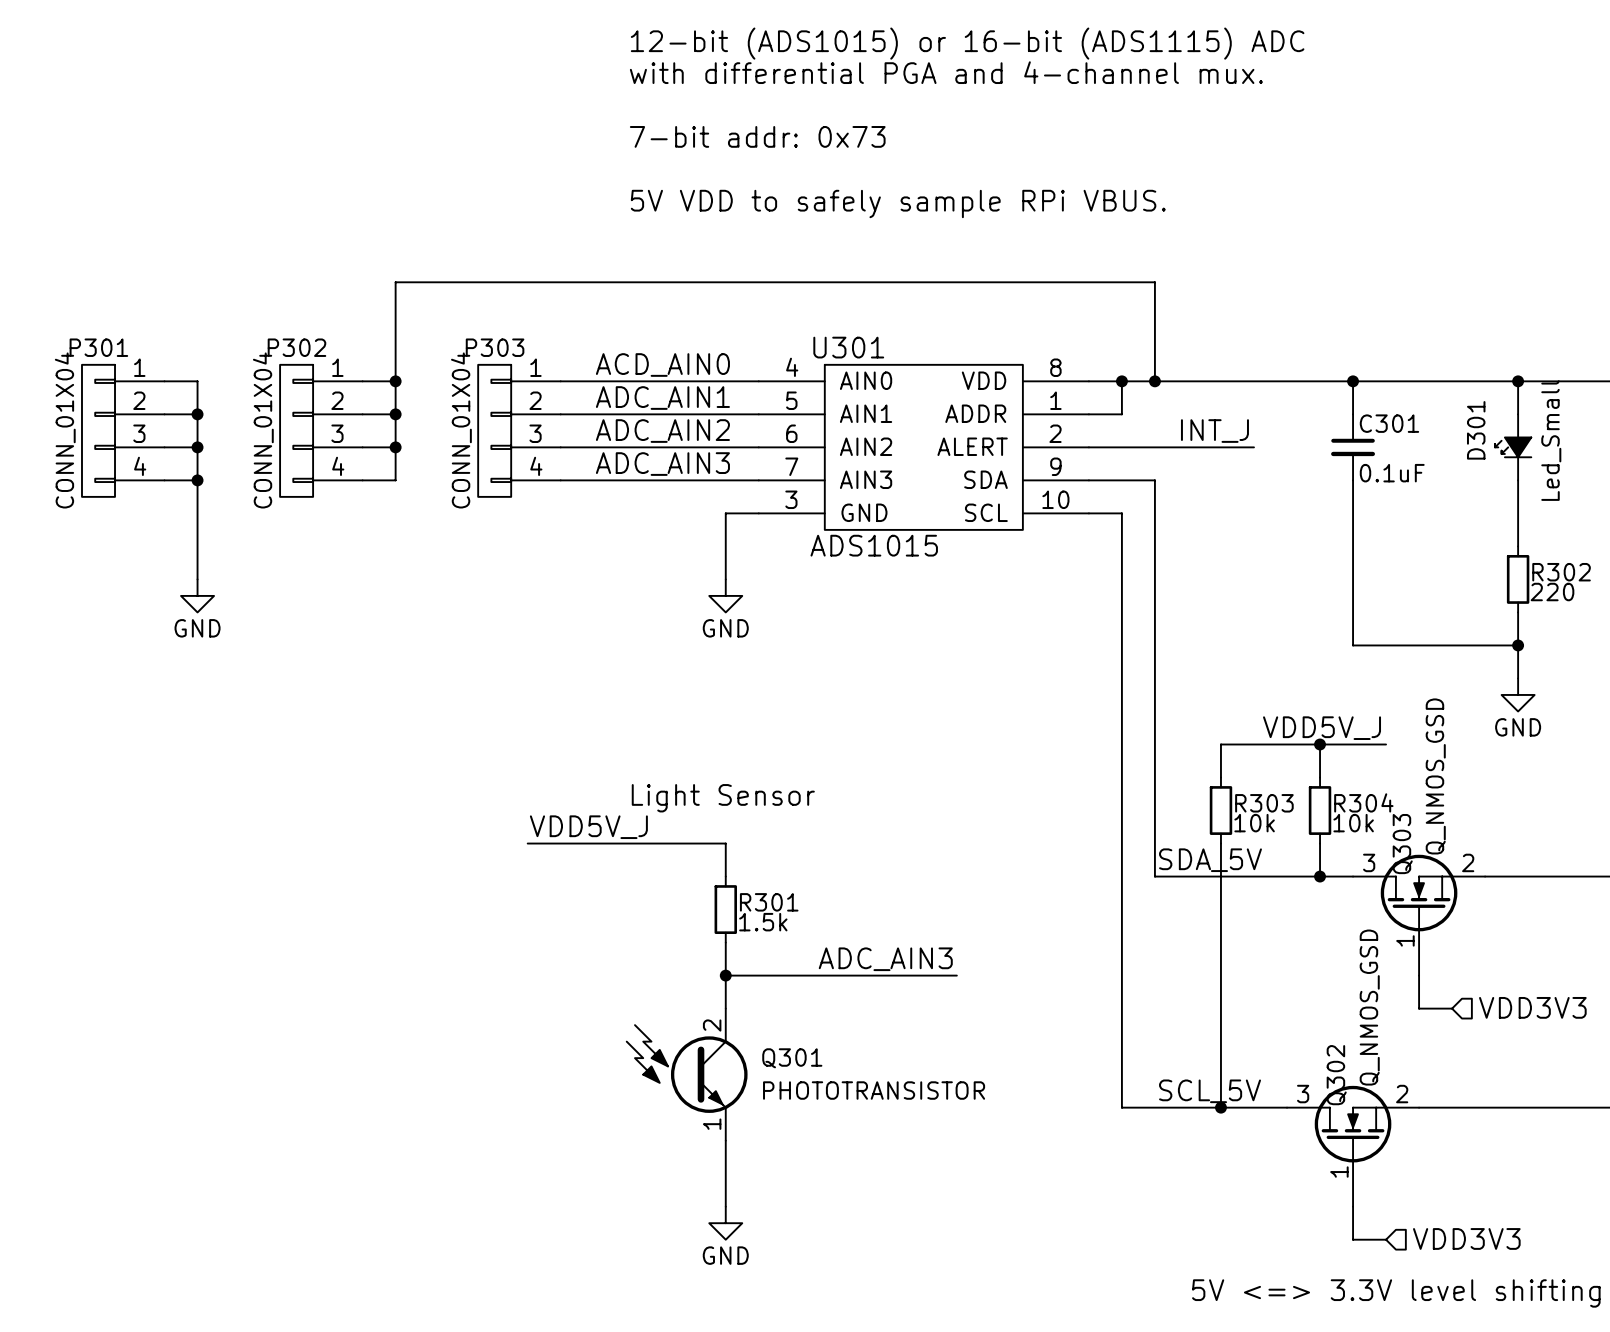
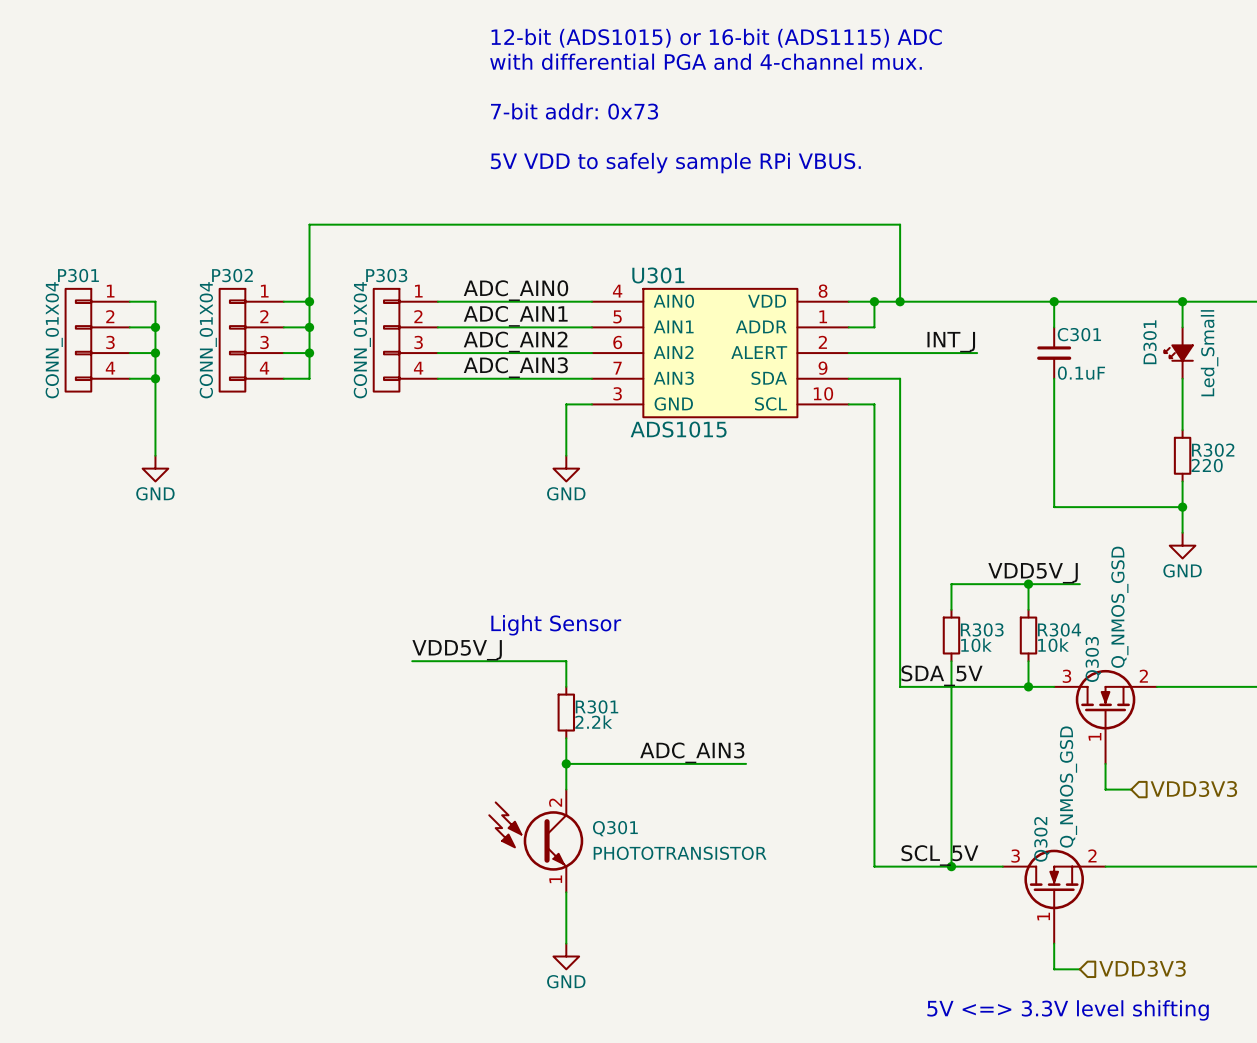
label: ACD_AIN0 (662, 365) -> ADC_AIN0 (515, 290)
R301 value: 1.5k (763, 922) -> 2.2k (593, 722)

